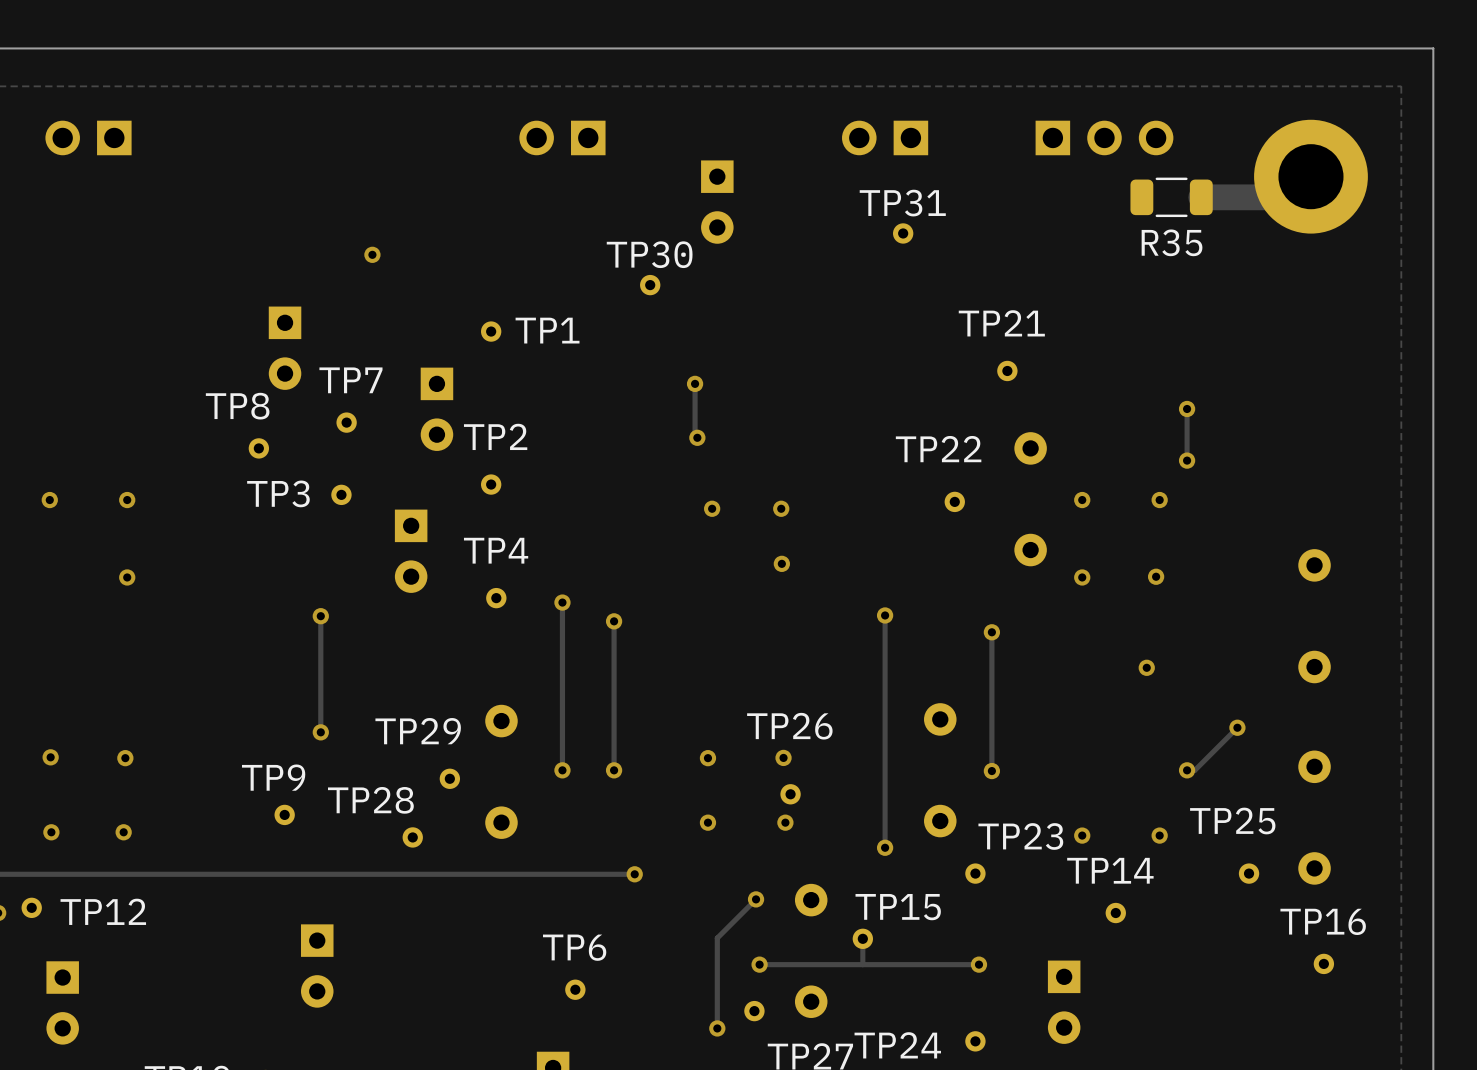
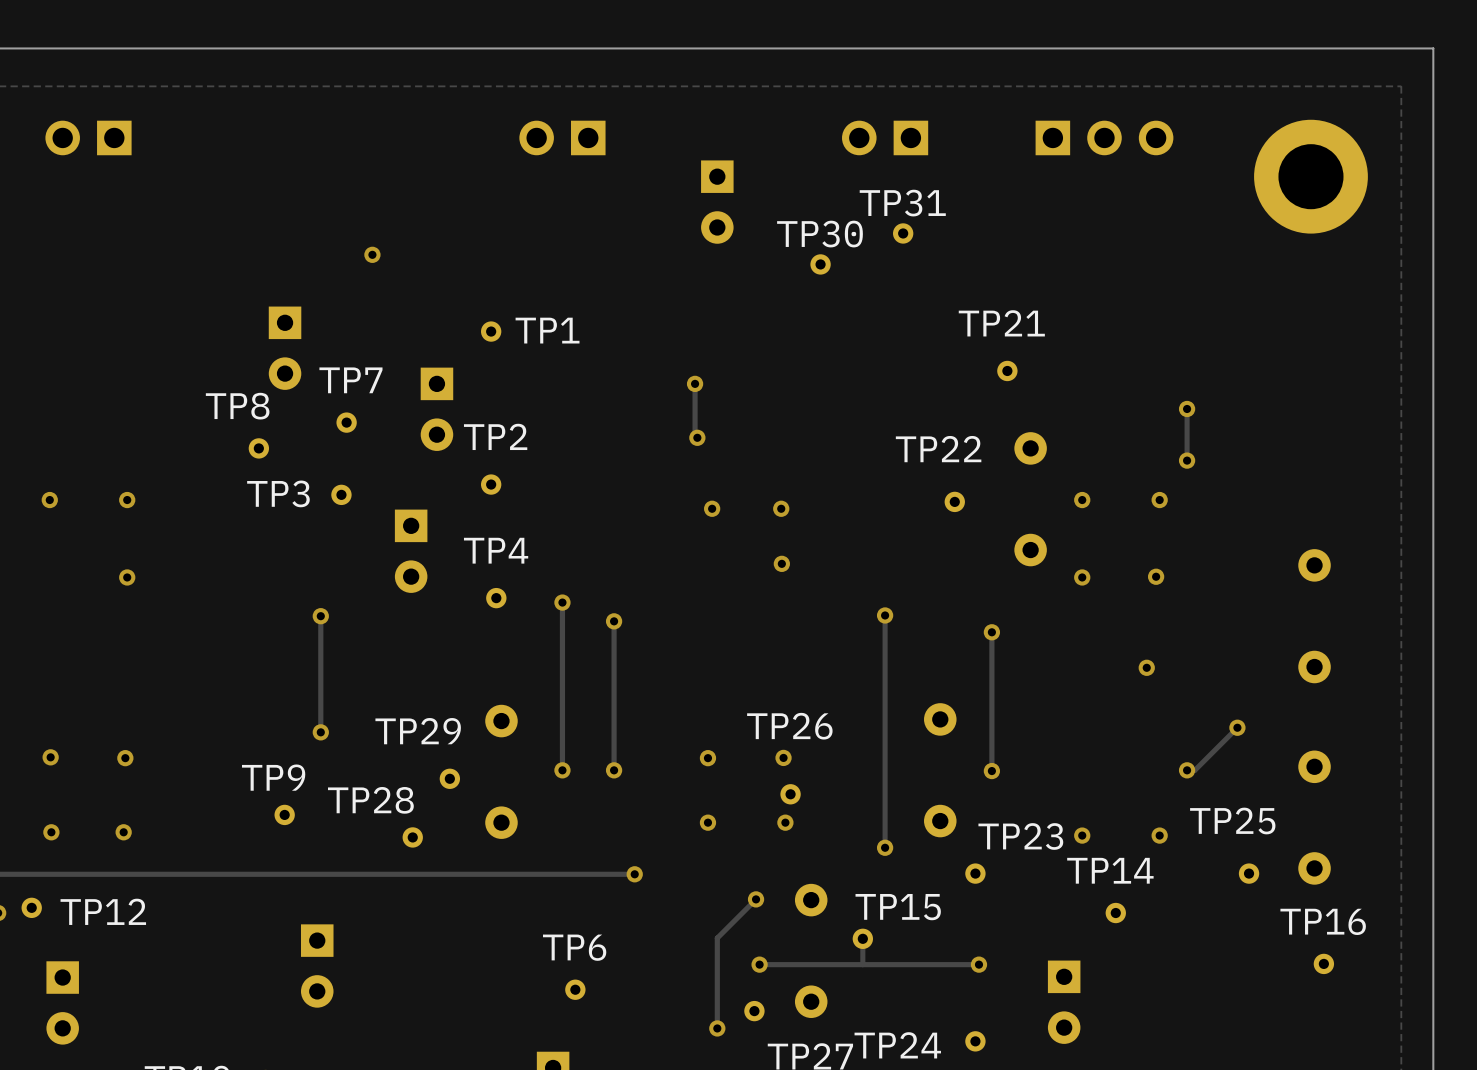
R35: (1171, 197) -> none
track: (1290, 197) (1201, 197) -> none
TP30 position: (650, 285) -> (820, 264)

